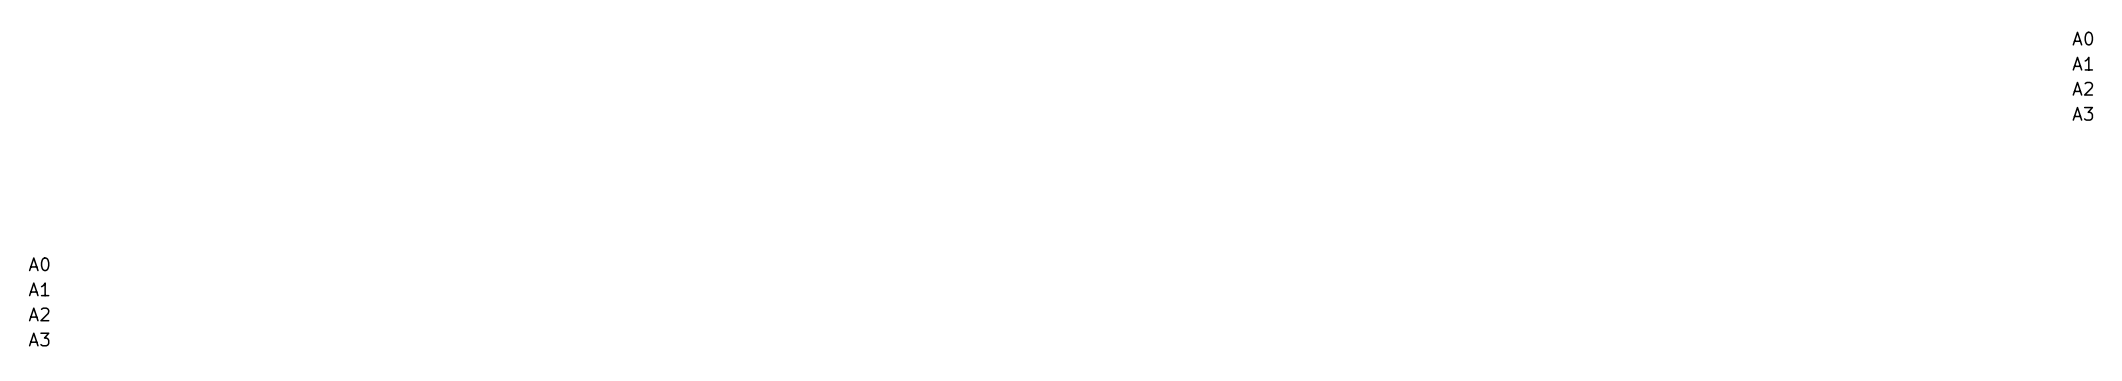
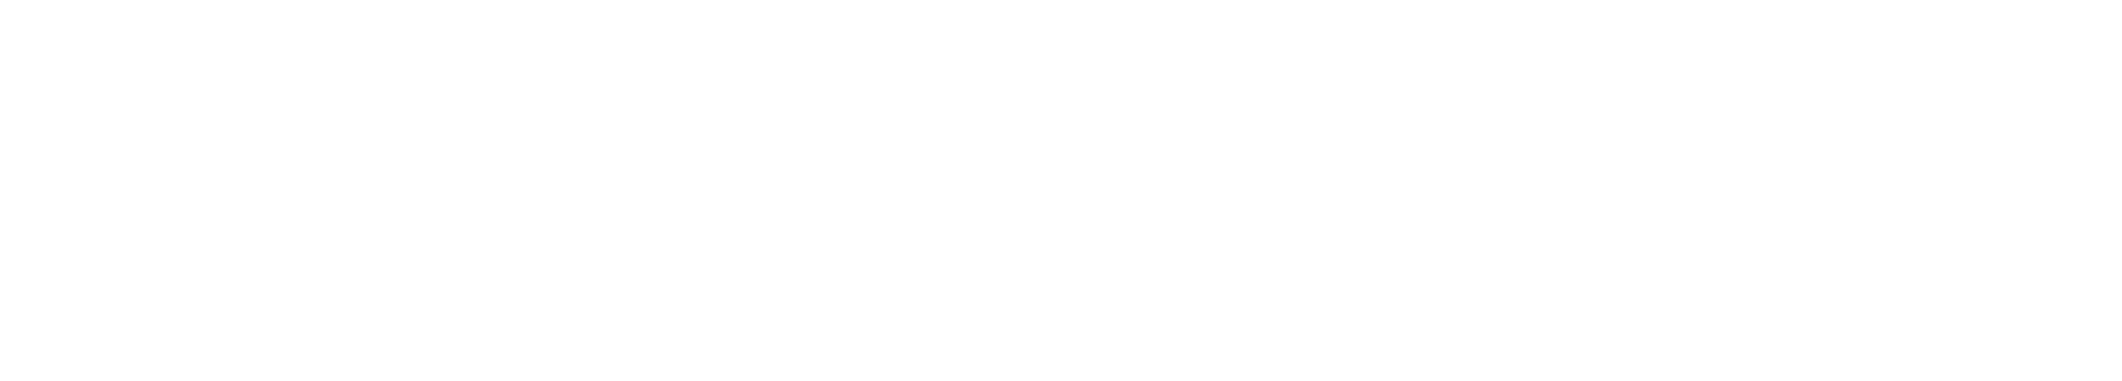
label: A0 (2082, 38) -> none
label: A1 (2082, 63) -> none
label: A2 (2082, 88) -> none
label: A3 (2082, 113) -> none
label: A0 (39, 264) -> none
label: A1 (39, 289) -> none
label: A2 (39, 314) -> none
label: A3 (39, 339) -> none

